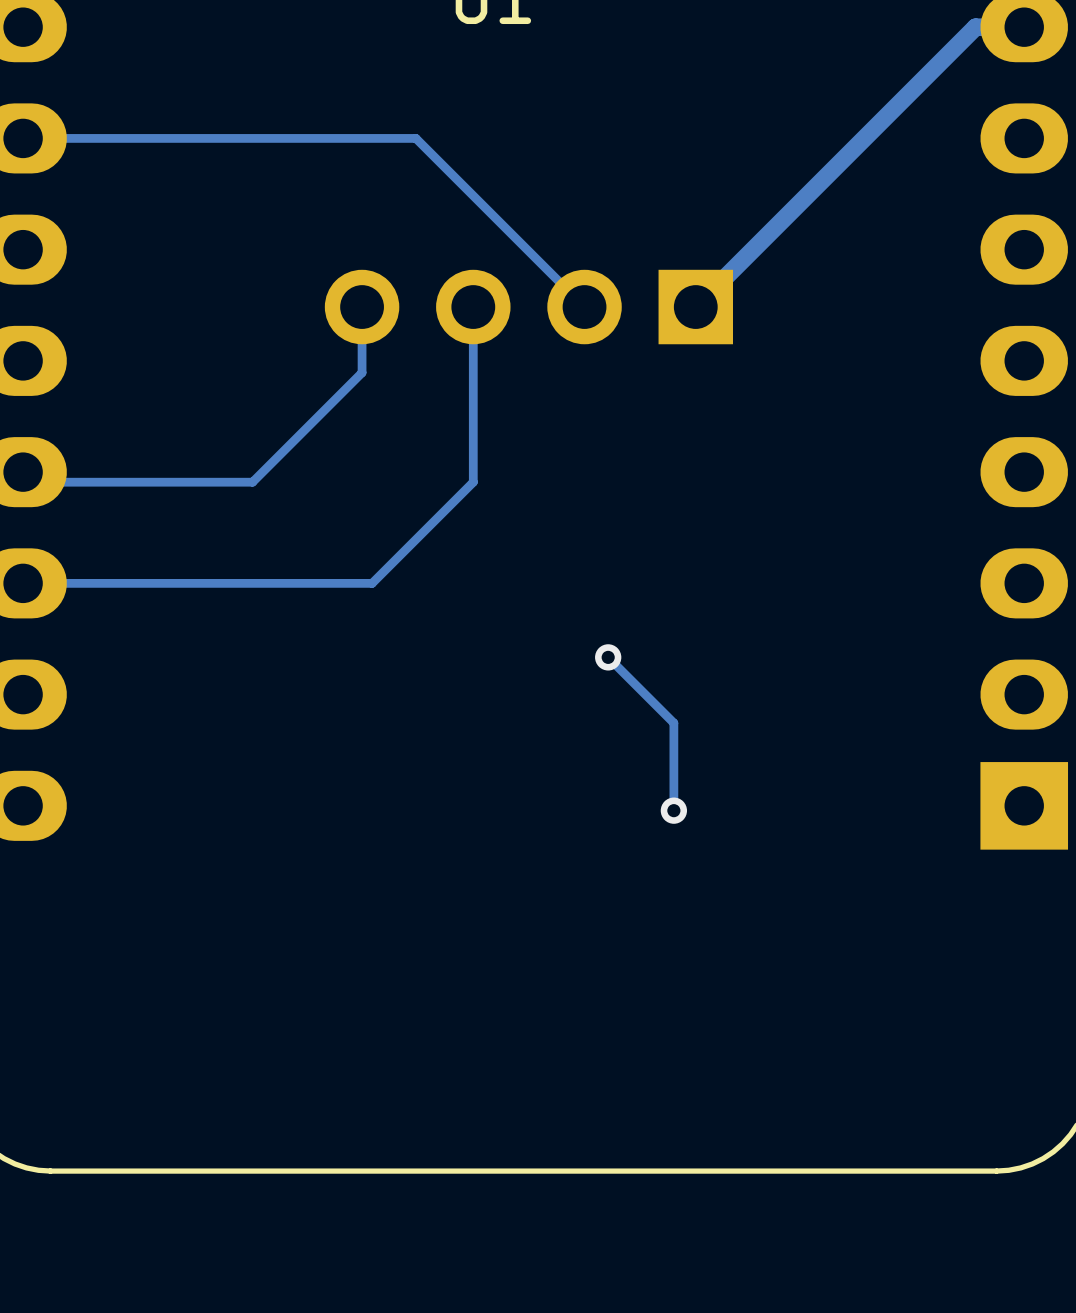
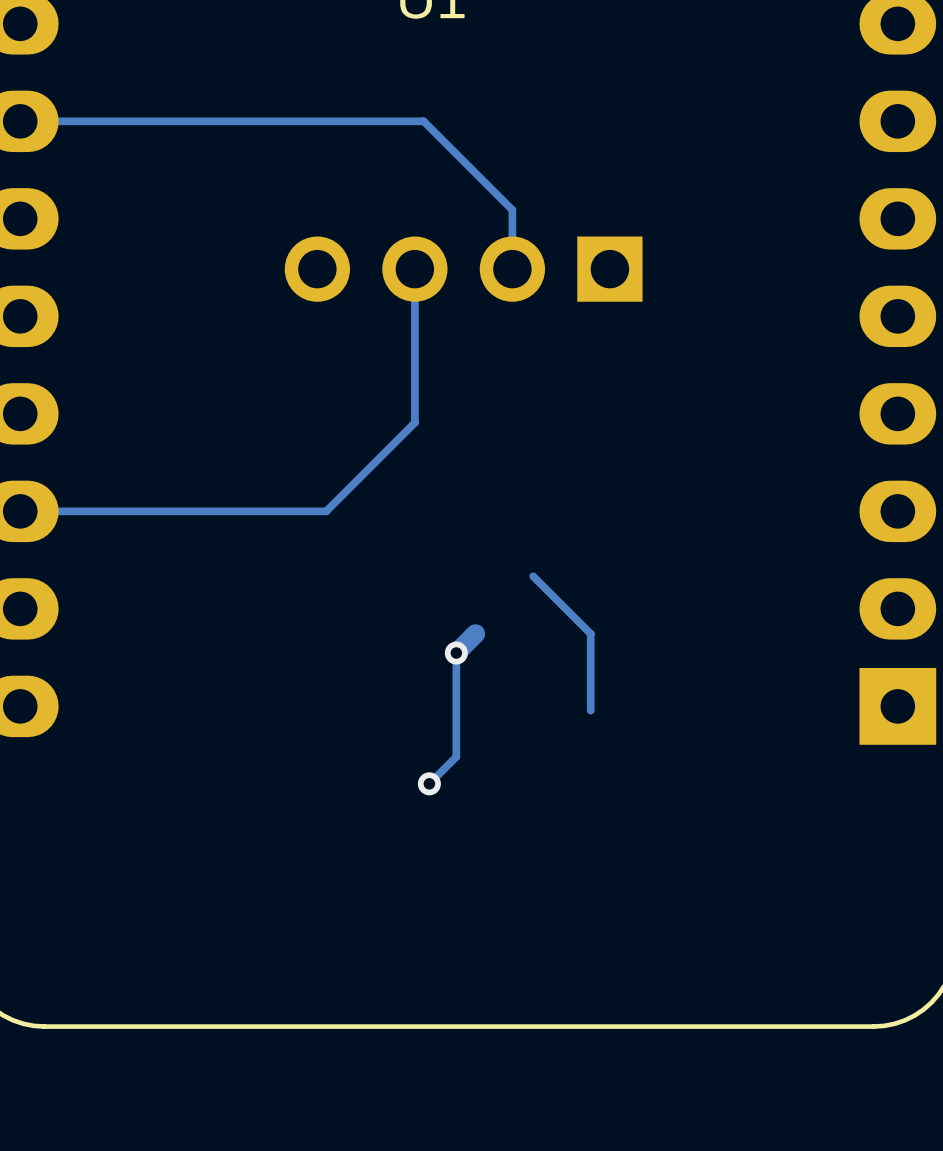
track: (1024, 27) (975, 27) (695, 307) -> none
track: (415, 138) (584, 307) -> (364, 121) (423, 121) (512, 210) (512, 269)
track: (362, 307) (362, 372) (252, 482) (33, 482) (23, 472) -> none
via: (608, 657) -> none
track: none -> (475, 633) (456, 653) (456, 756) (429, 783)
via: none -> (456, 653)
via: (673, 810) -> none
via: none -> (429, 783)

